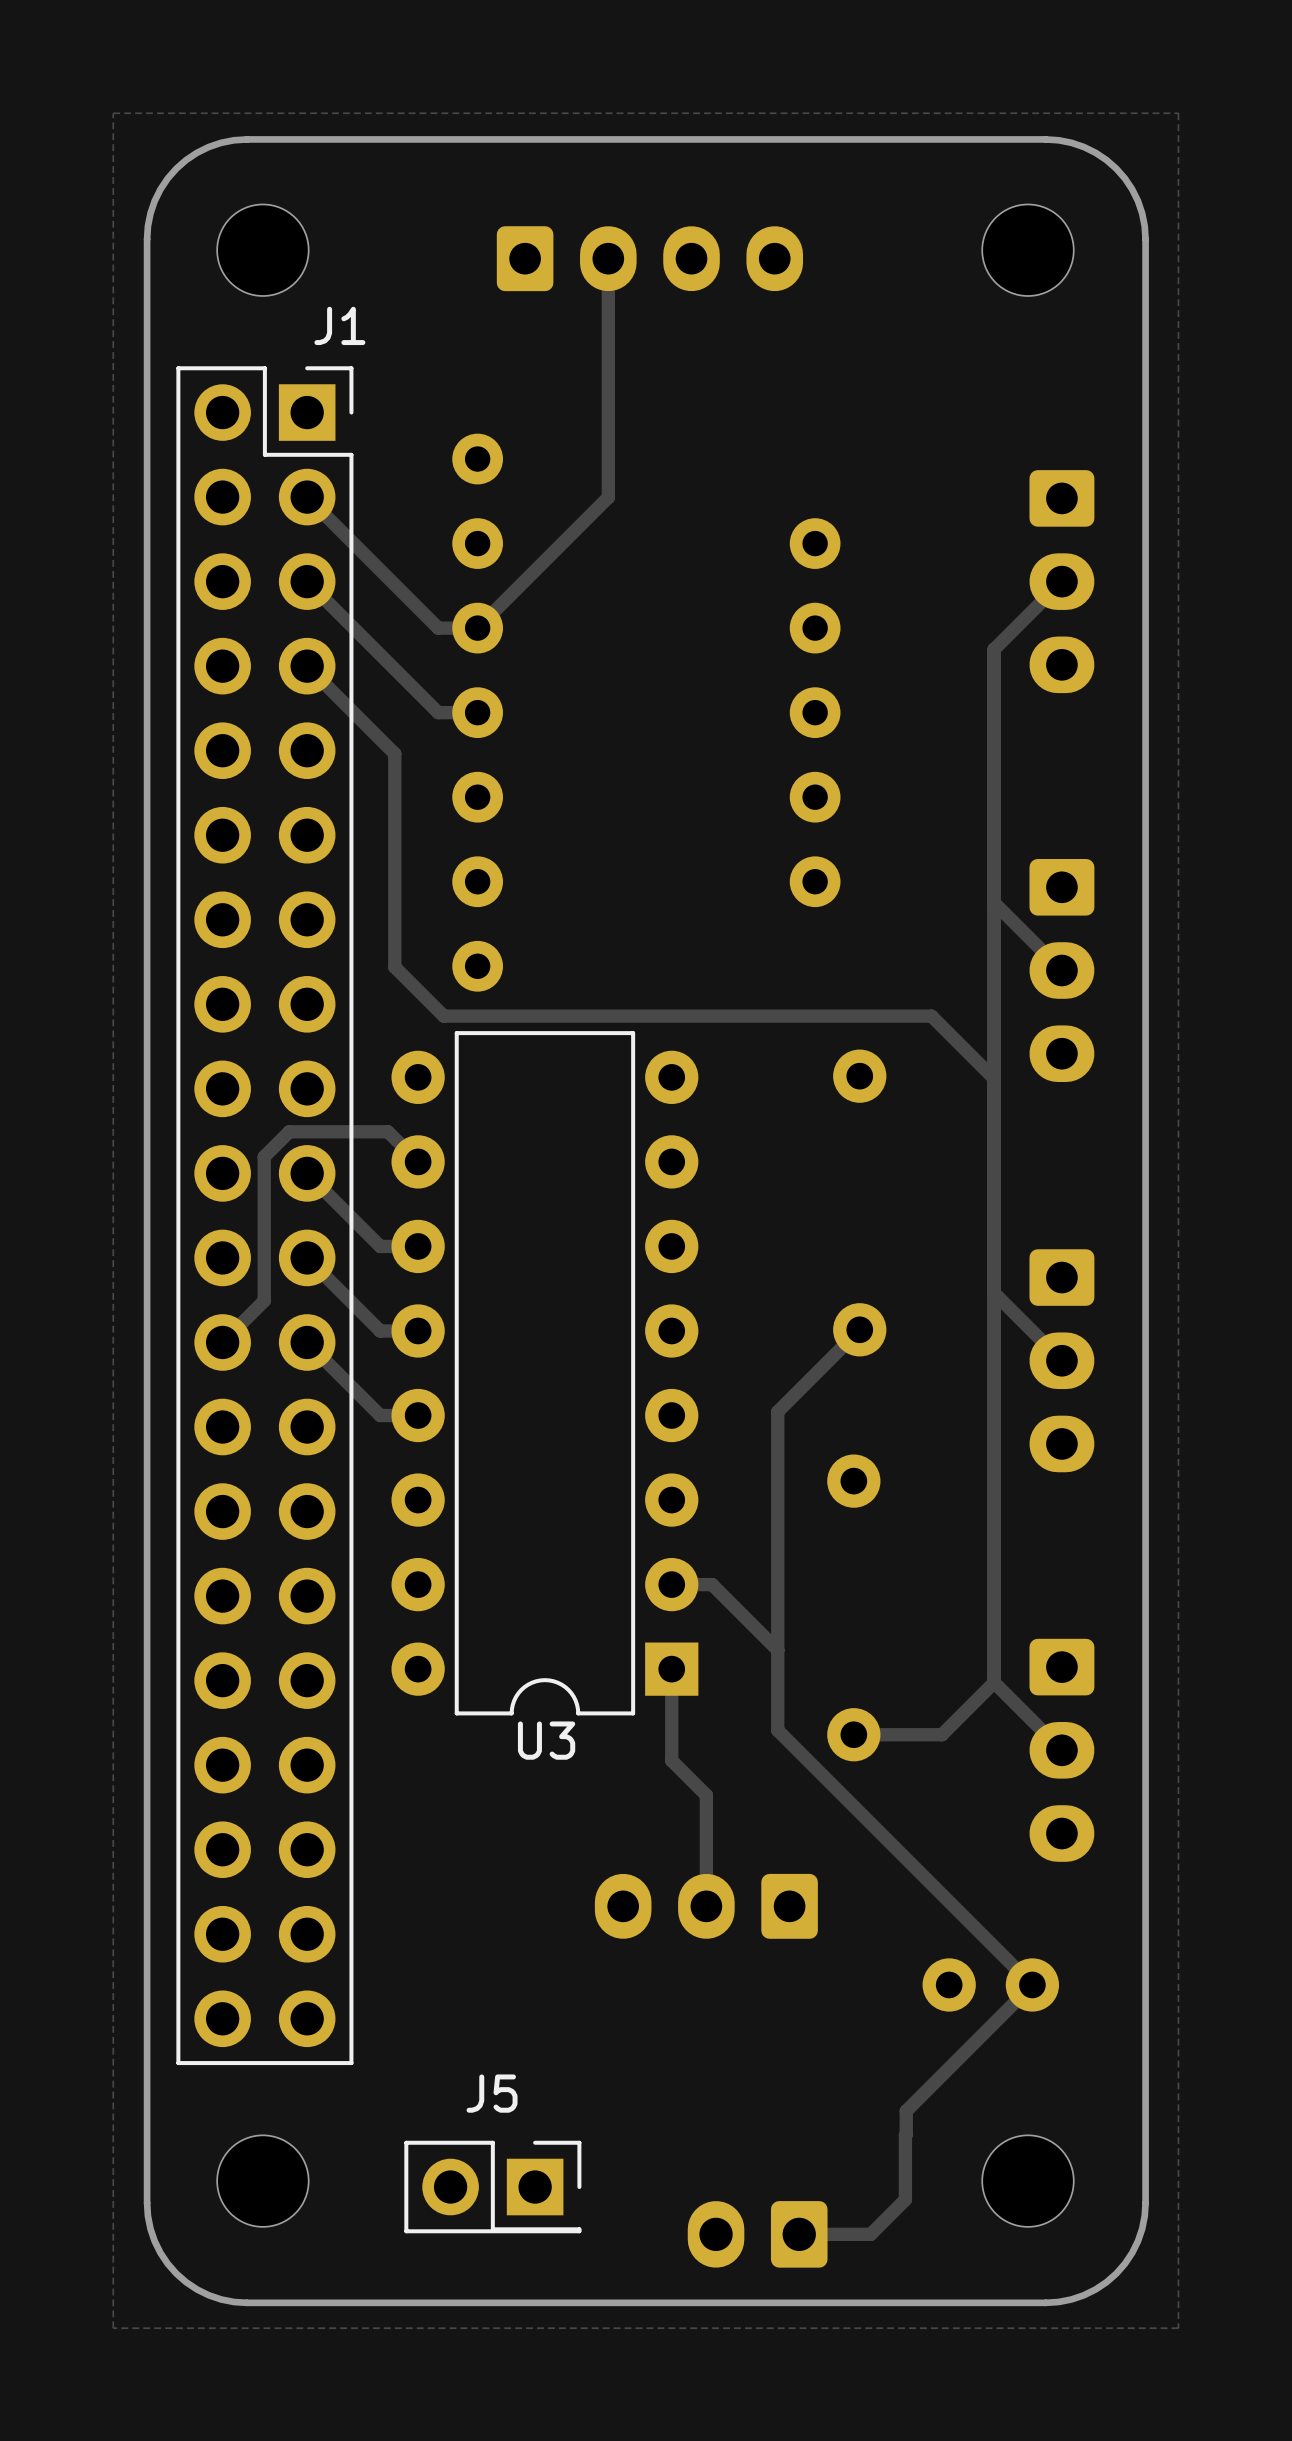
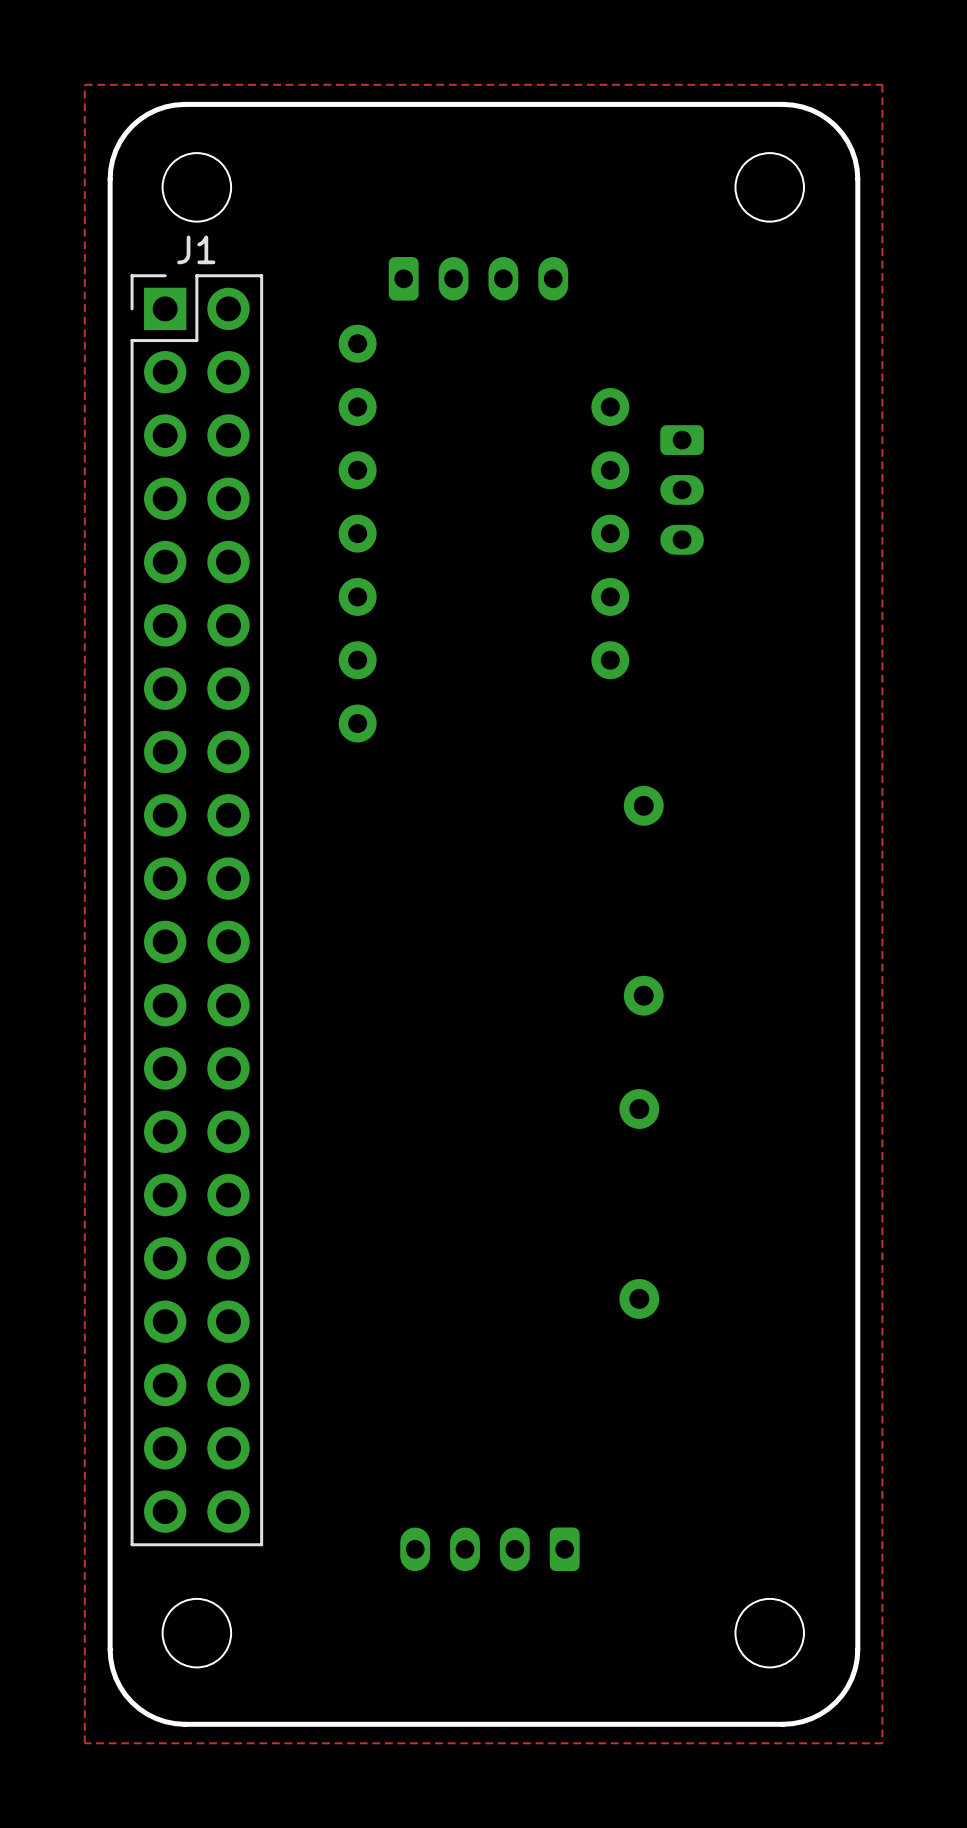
track: (608, 258) (608, 497) (477, 628) (438, 628) (307, 497) -> none
part: (649, 258) -> none
J1 name position: J1 (339, 325) -> J1 (196, 249)
J1 footprint: [176, 366, 354, 2066] -> [130, 274, 264, 1547]
part: none -> (478, 278)
track: (307, 581) (438, 712) (477, 712) -> none
track: (1061, 581) (994, 649) (994, 1682) -> none
part: (1061, 581) -> none
part: none -> (682, 489)
track: (307, 666) (394, 753) (394, 967) (443, 1016) (931, 1016) (994, 1078) -> none
track: (994, 902) (1061, 970) -> none
part: (1061, 970) -> none
track: (418, 1161) (388, 1131) (289, 1131) (264, 1156) (264, 1300) (222, 1342) -> none
track: (307, 1173) (380, 1246) (418, 1246) -> none
track: (307, 1257) (380, 1330) (418, 1330) -> none
track: (994, 1292) (1061, 1360) -> none
track: (859, 1329) (777, 1411) (777, 1730) (1032, 1984) (906, 2111) (905, 2199) (870, 2234) (799, 2234) -> none
track: (307, 1342) (380, 1415) (418, 1415) -> none
part: (1061, 1360) -> none
U3: (544, 1373) -> none
track: (671, 1584) (712, 1584) (777, 1650) -> none
track: (671, 1669) (671, 1760) (706, 1795) (706, 1906) -> none
track: (994, 1682) (941, 1734) (853, 1734) -> none
track: (994, 1682) (1061, 1750) -> none
part: (1061, 1750) -> none
part: (706, 1906) -> none
part: (990, 1984) -> none
part: none -> (489, 1549)
J5: (492, 2187) -> none
part: (757, 2234) -> none

